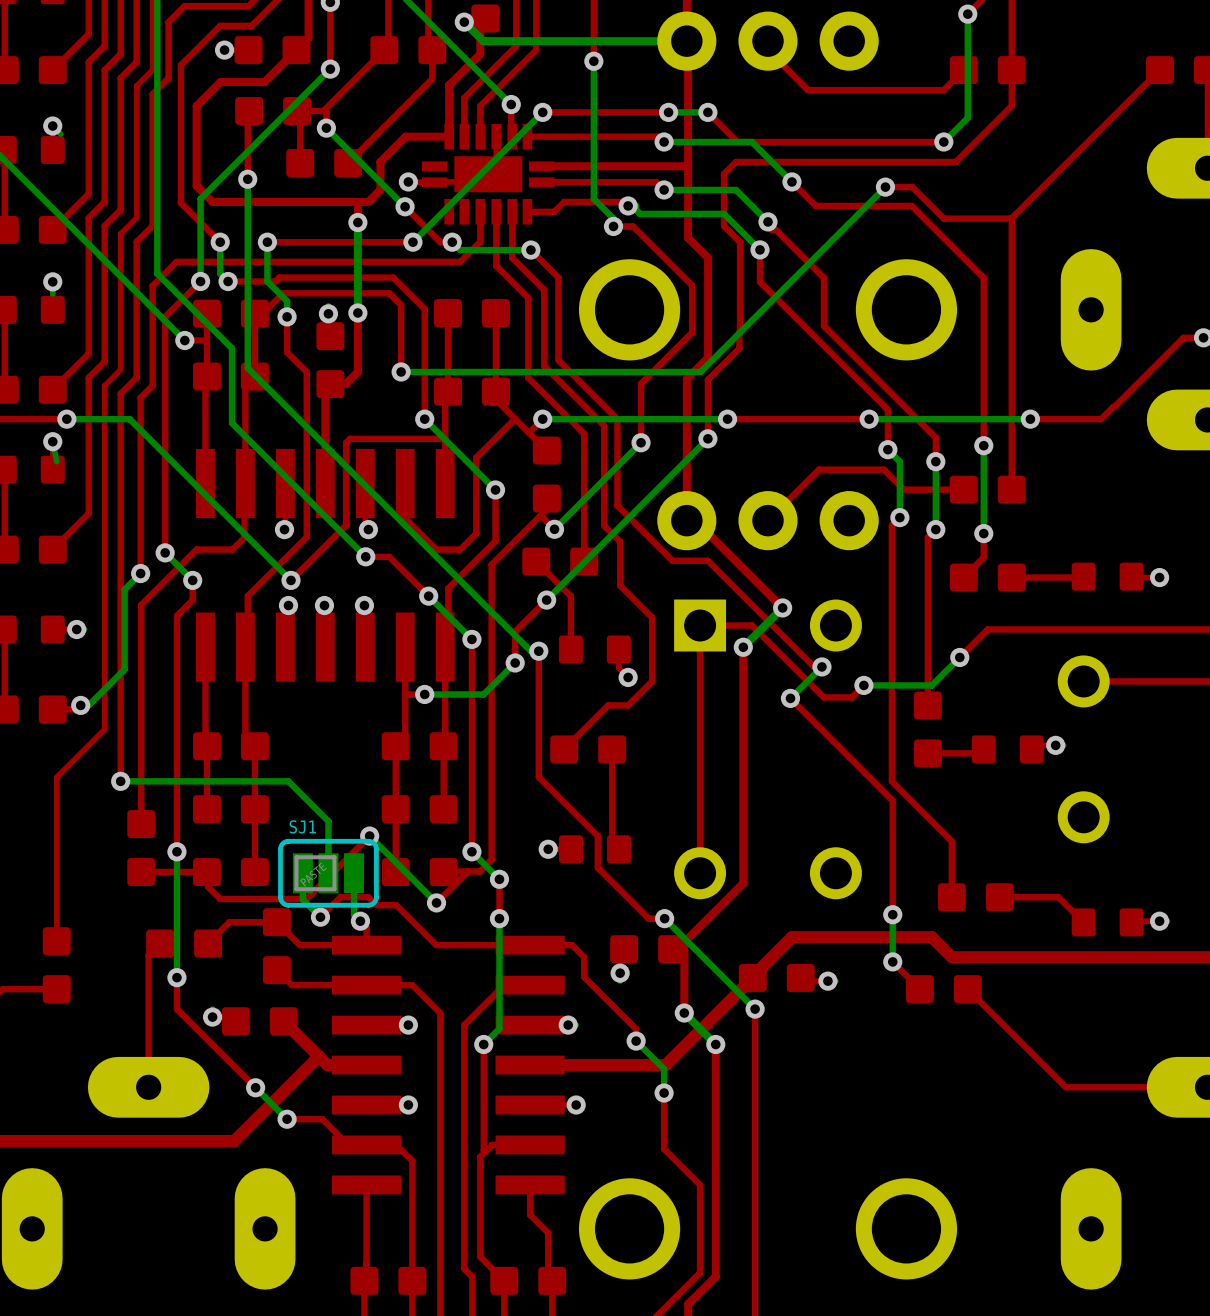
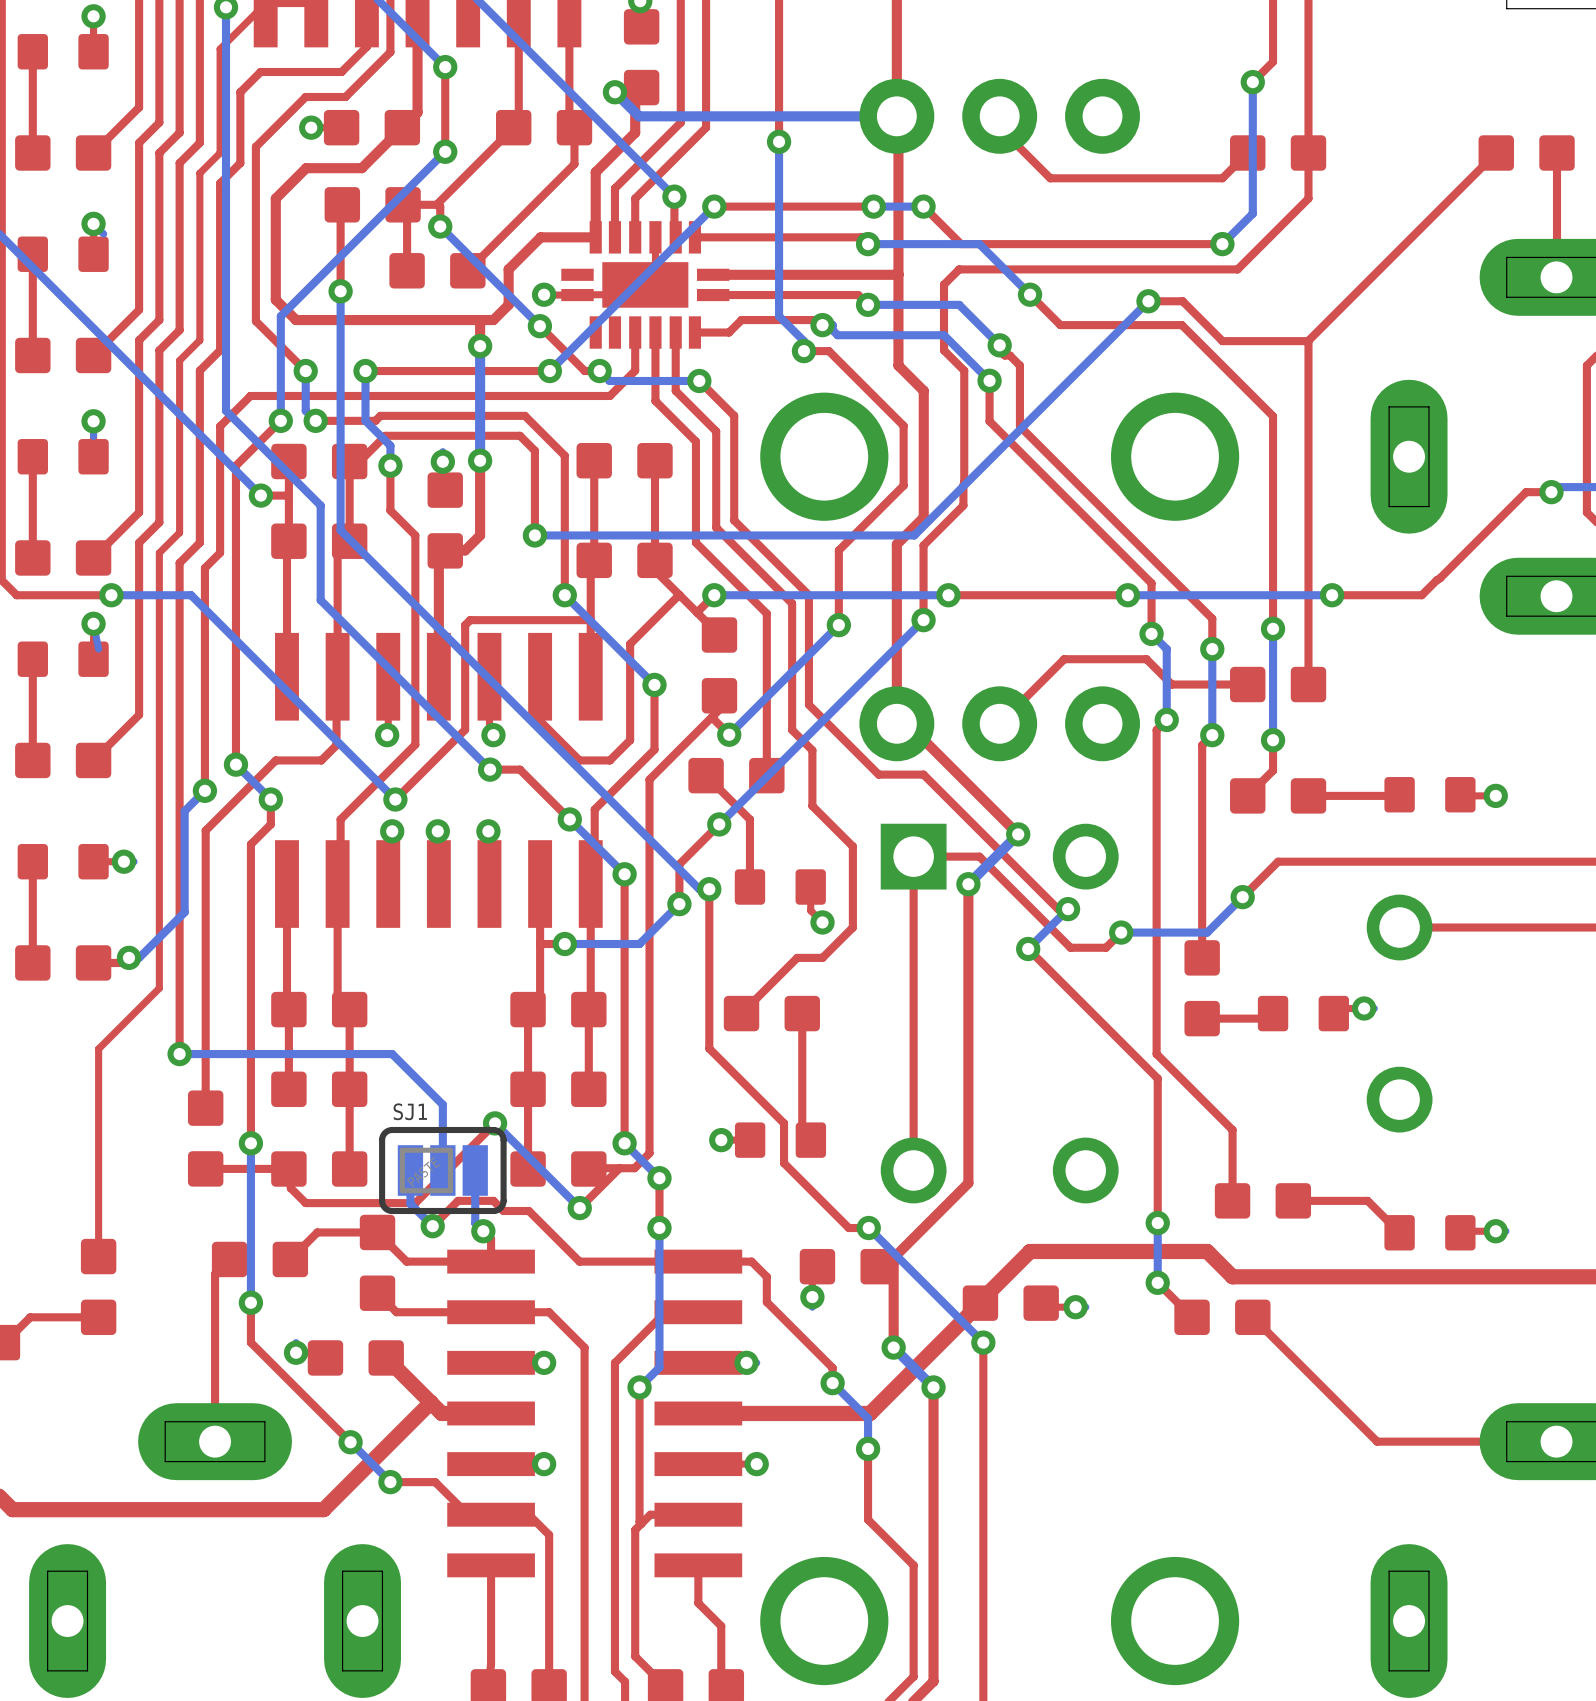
top track: (783, 237) (823, 277) (823, 325) -> (1019, 365) (1019, 426) (1070, 476)

